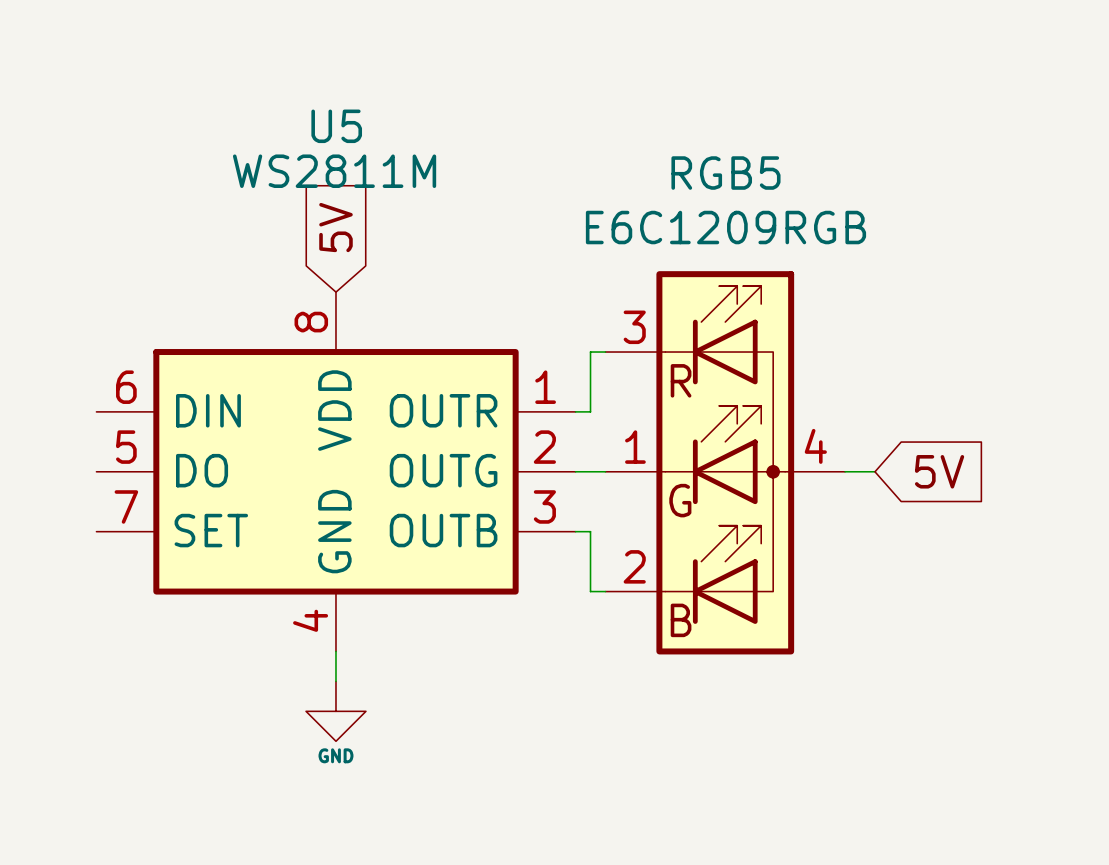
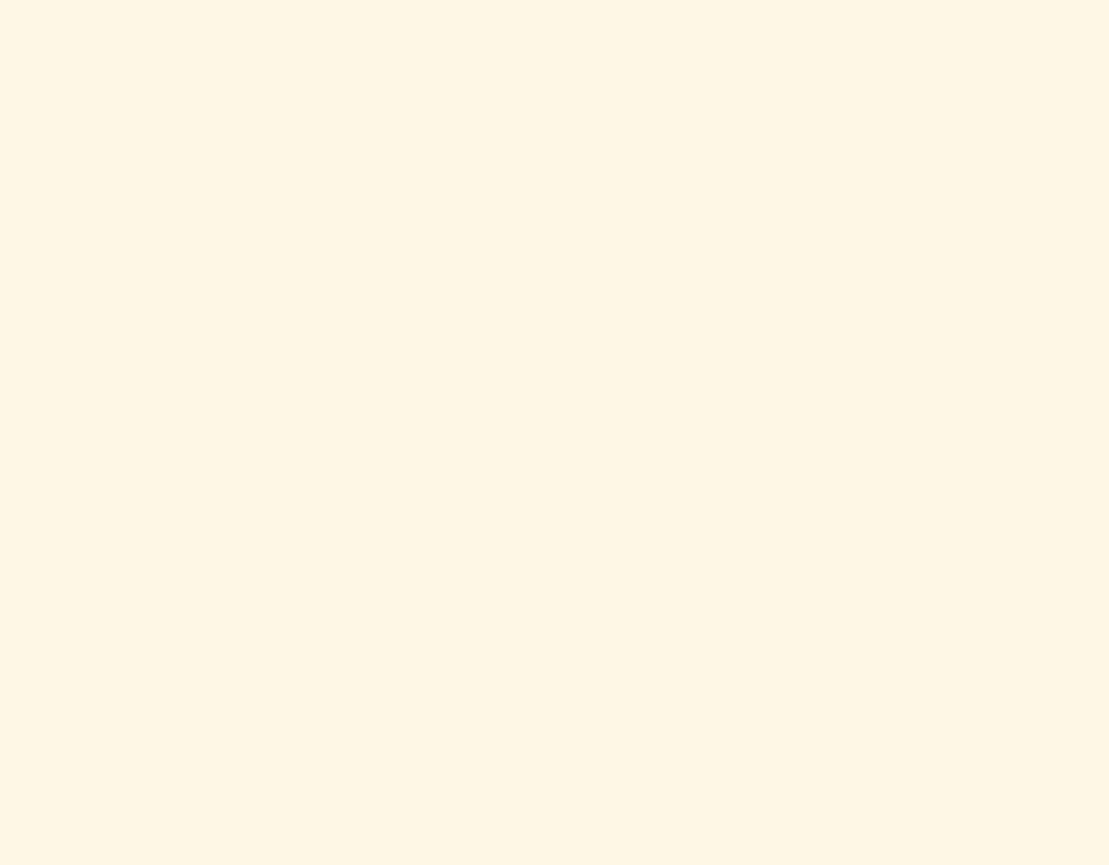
global label: 5V (335, 227) -> none
wire: (605, 352) (590, 352) (590, 411) (575, 411) -> none
RGB5: E6C1209RGB (725, 462) -> none
U5: WS2811M (335, 471) -> none
wire: (575, 471) (605, 471) -> none
wire: (845, 471) (874, 471) -> none
global label: 5V (939, 471) -> none
wire: (575, 531) (590, 531) (590, 591) (605, 591) -> none
wire: (335, 651) (335, 681) -> none
power symbol: GND (335, 711) -> none

